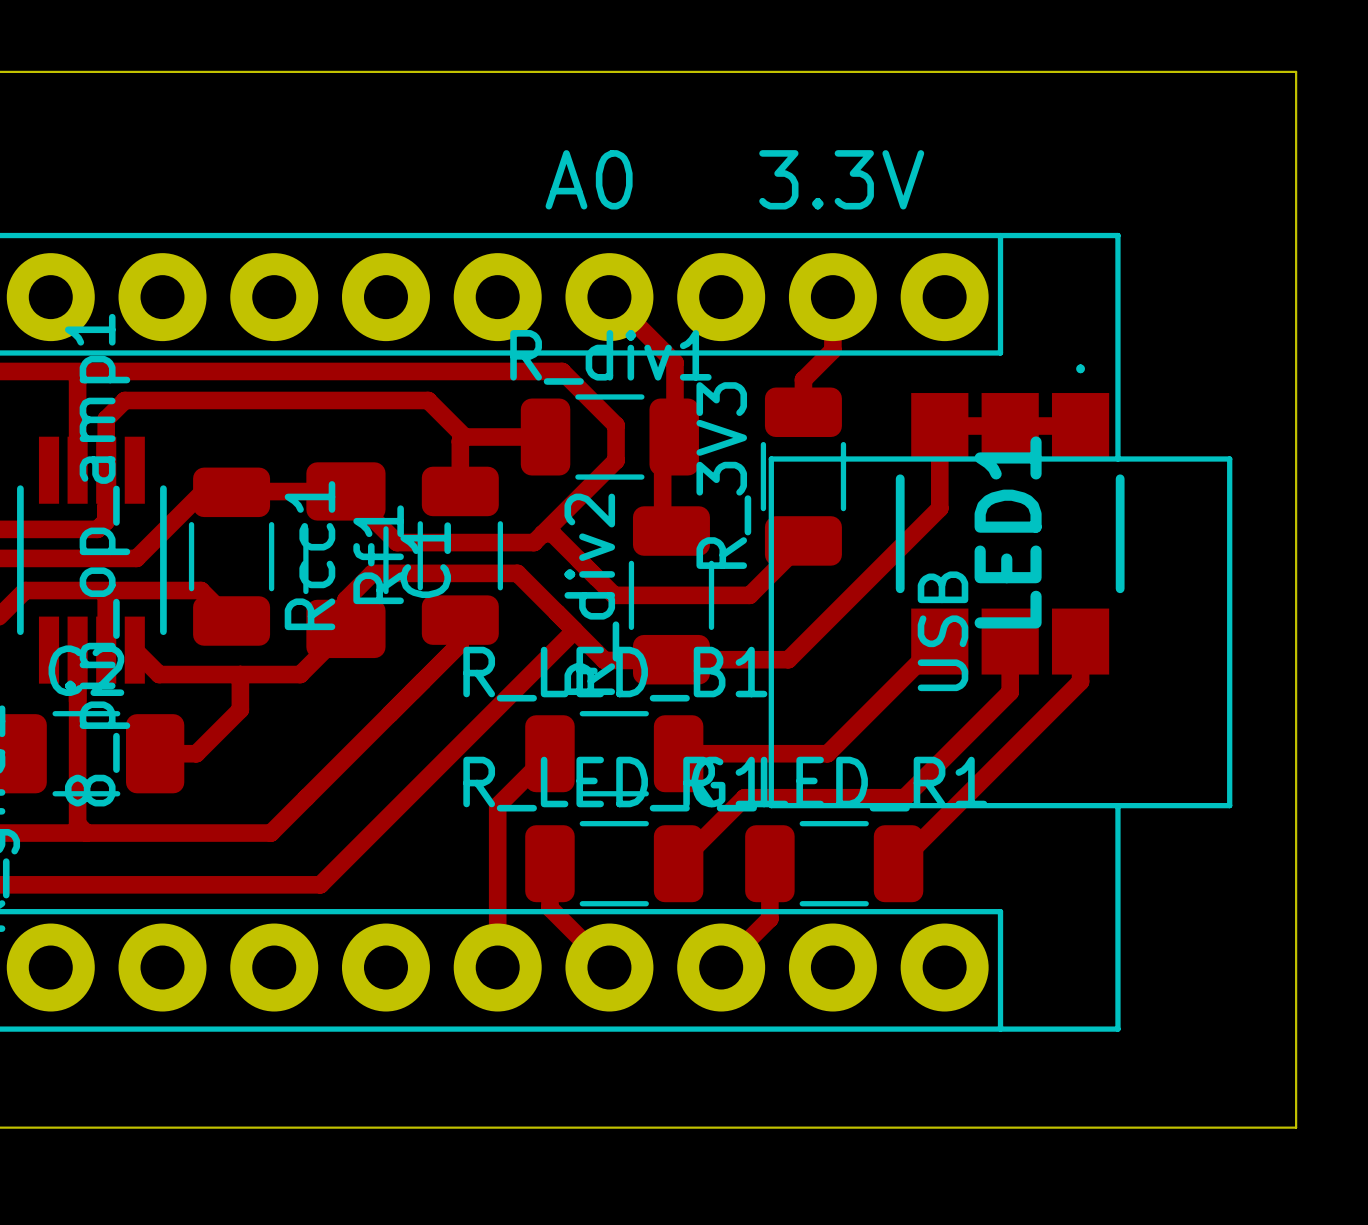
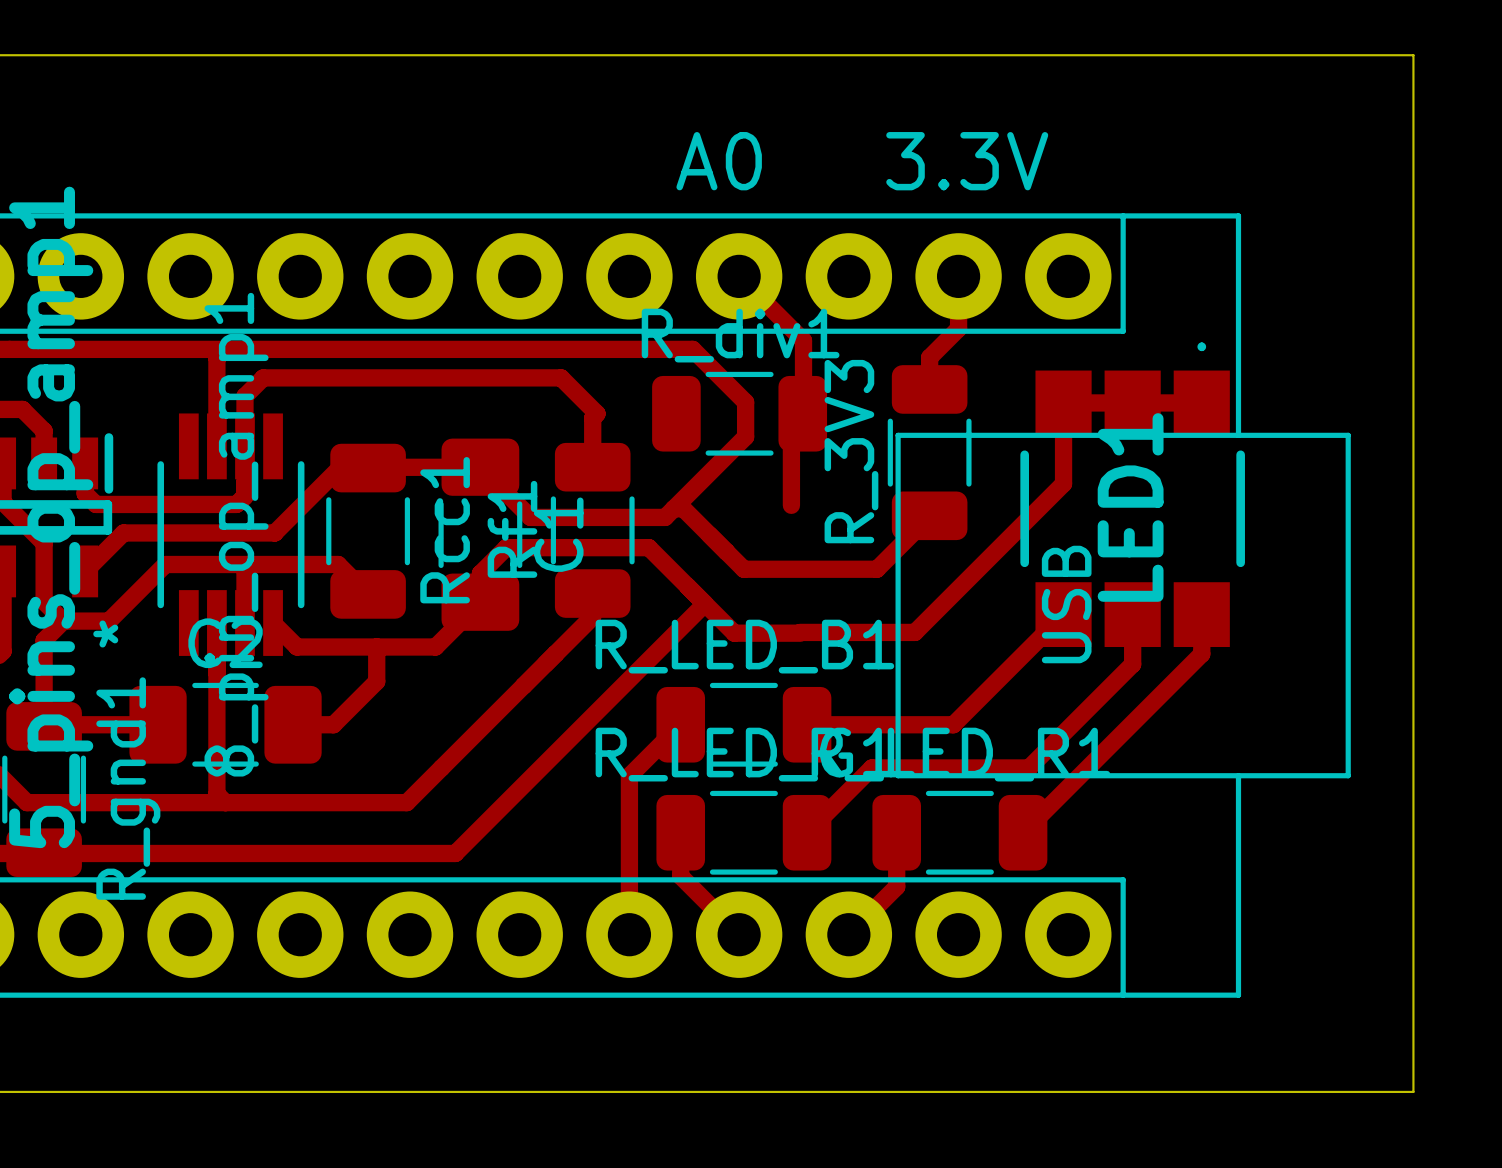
top track: (464, 437) (544, 437) -> none
R_div2: (671, 595) -> none

